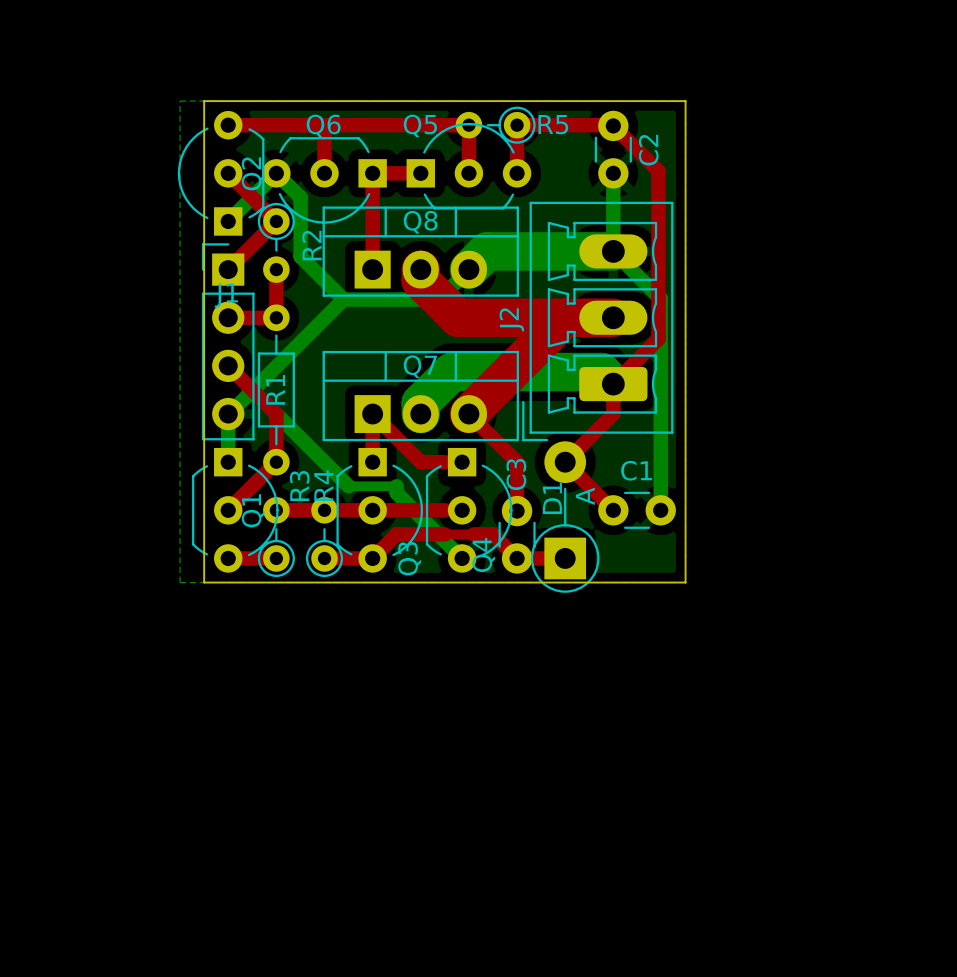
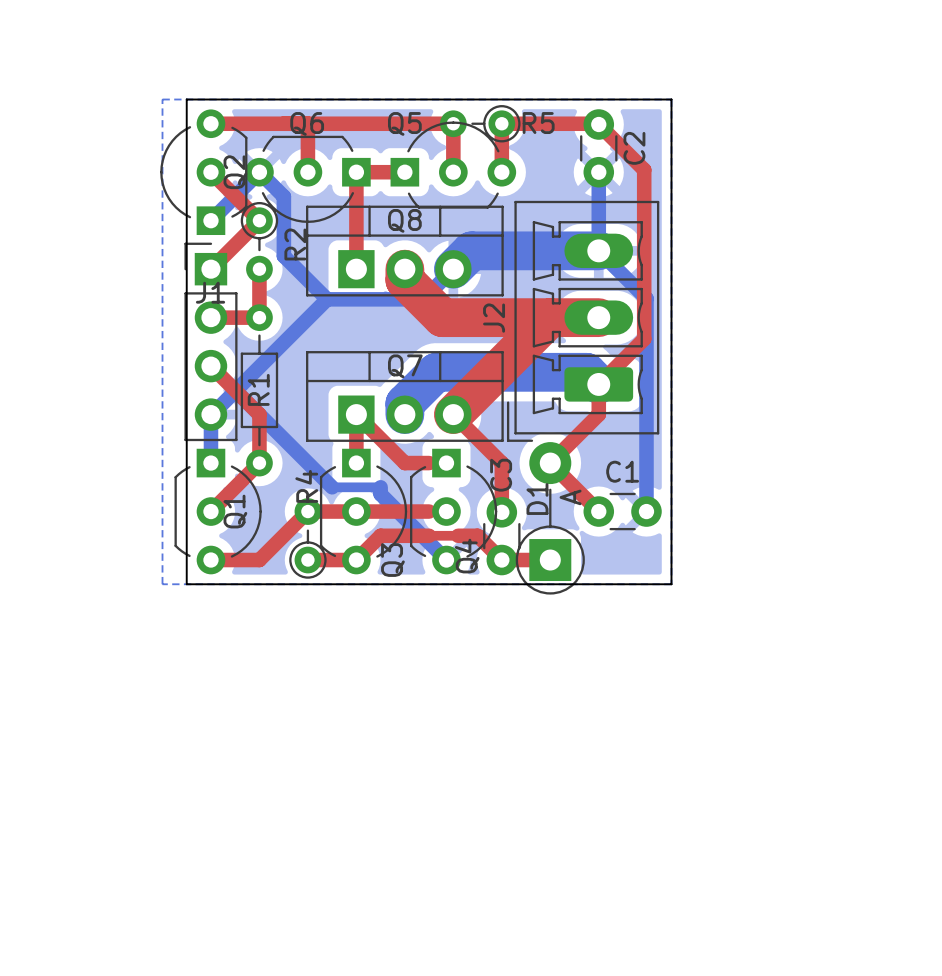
top track: (276, 510) (324, 510) -> (259, 560) (307, 511)
R3: (276, 537) -> none

